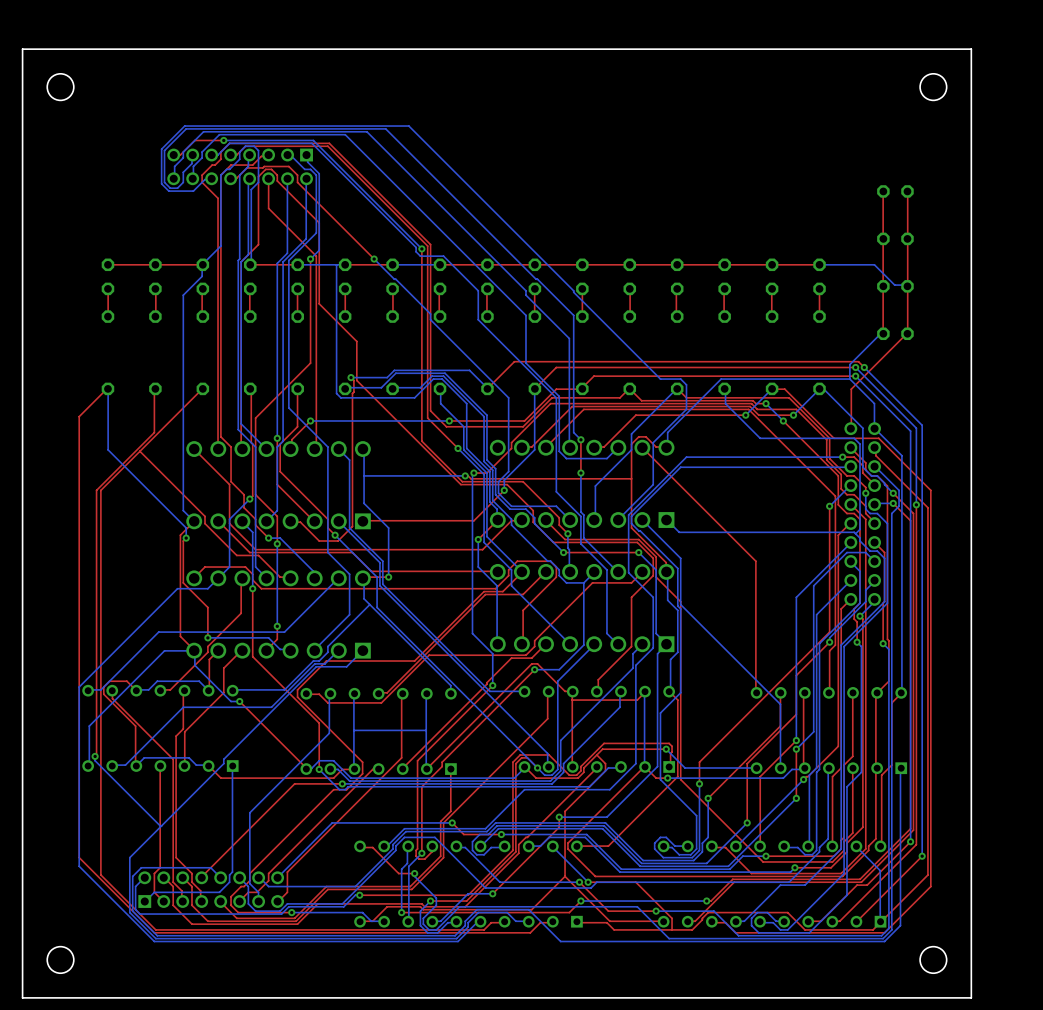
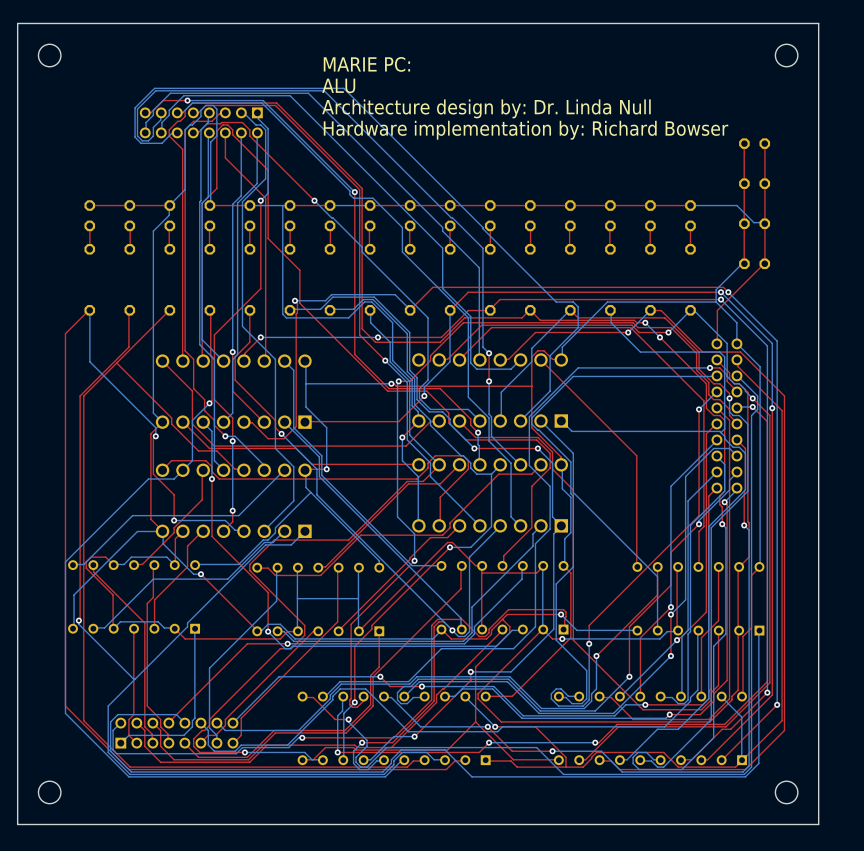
text: none -> MARIE PC: (366, 64)
text: none -> ALU (338, 85)
text: none -> Architecture design by: Dr. Linda Null (486, 108)
text: none -> Hardware implementation by: Richard Bowser (526, 130)

